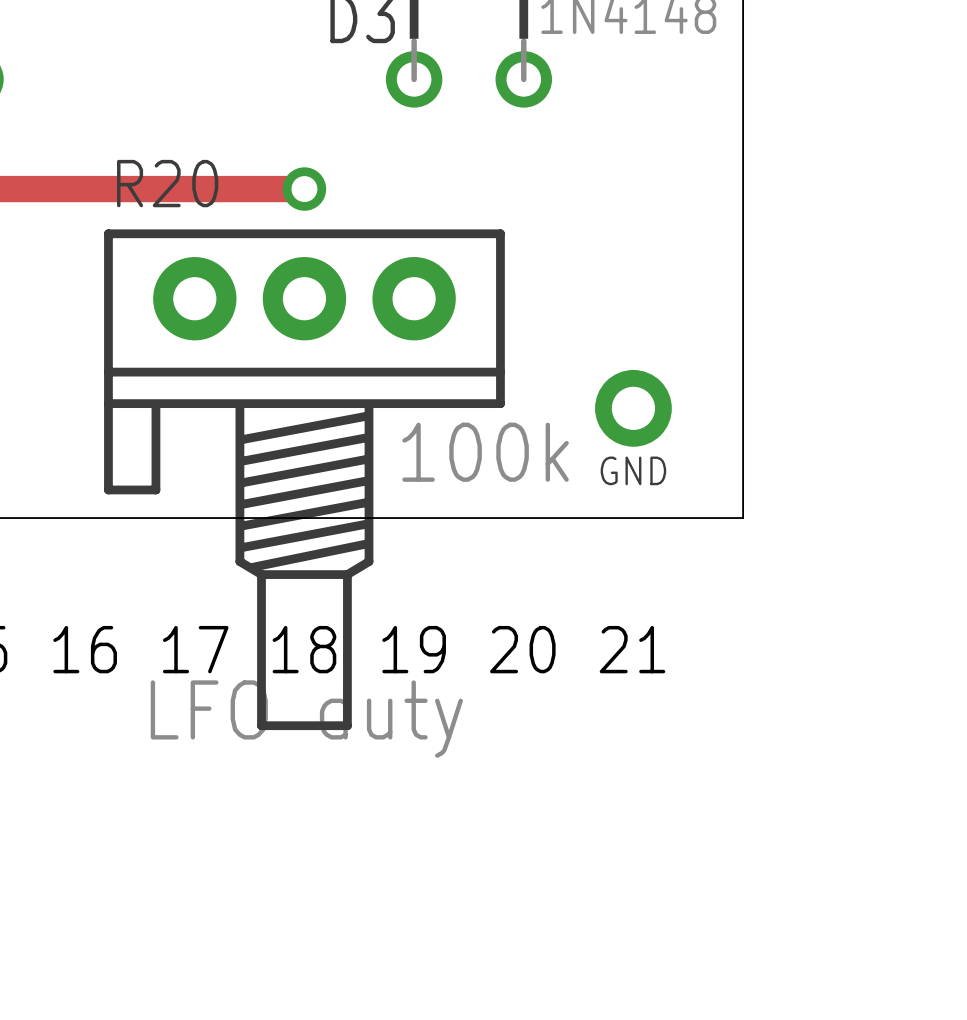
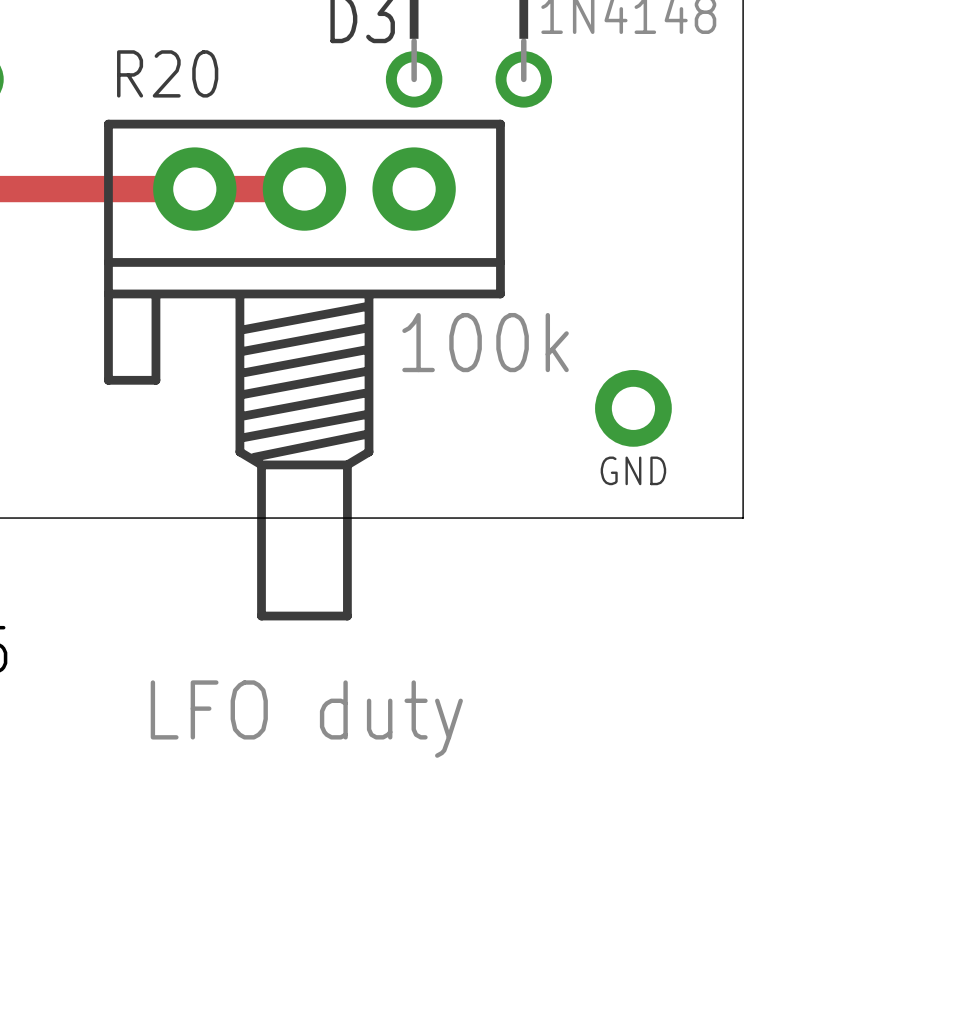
via: (304, 189) -> none
R20 position: (304, 479) -> (304, 370)
text: 16 (85, 649) -> none
text: 17 (195, 649) -> none
text: 18 (304, 649) -> none
text: 19 (414, 649) -> none
text: 20 (522, 649) -> none
text: 21 (632, 649) -> none

